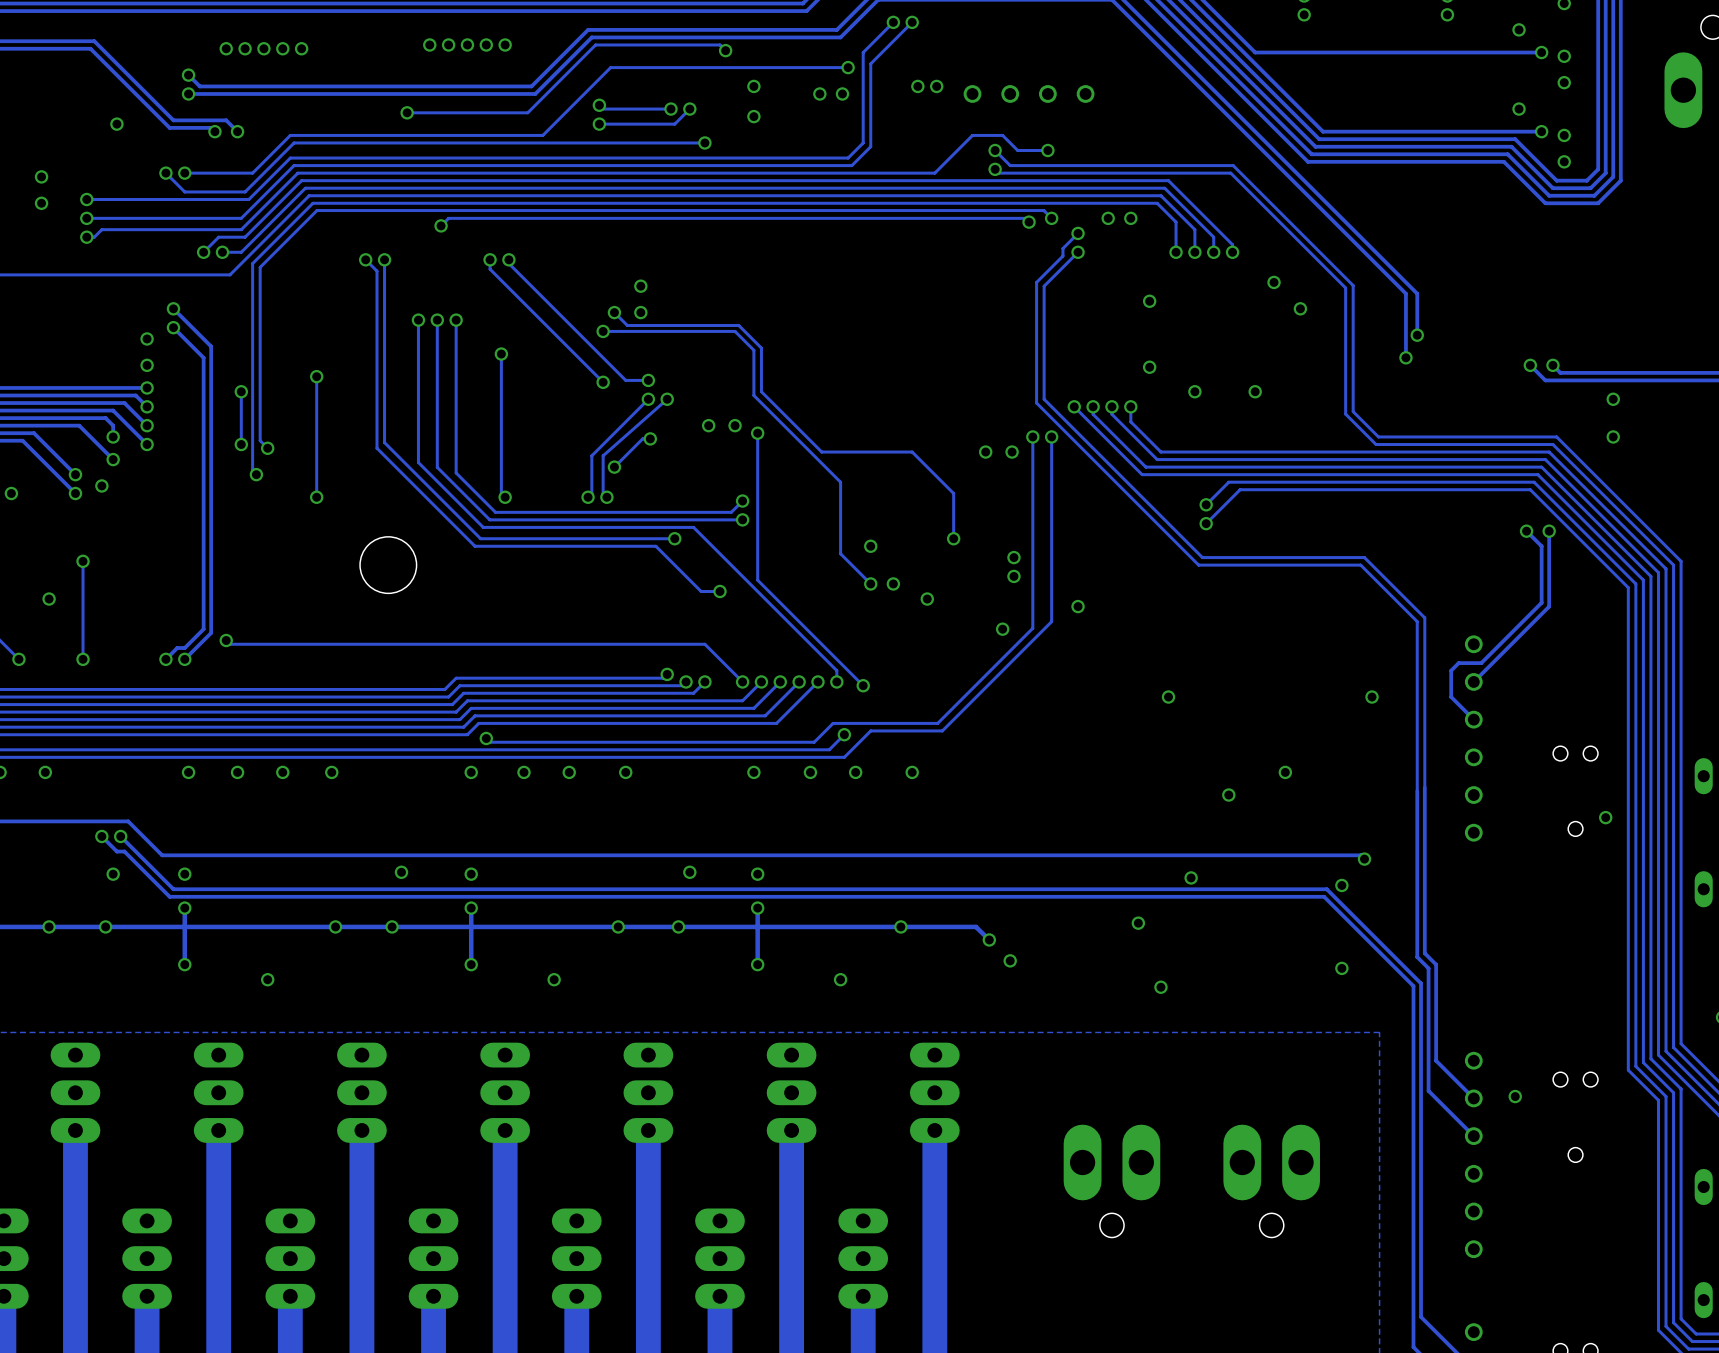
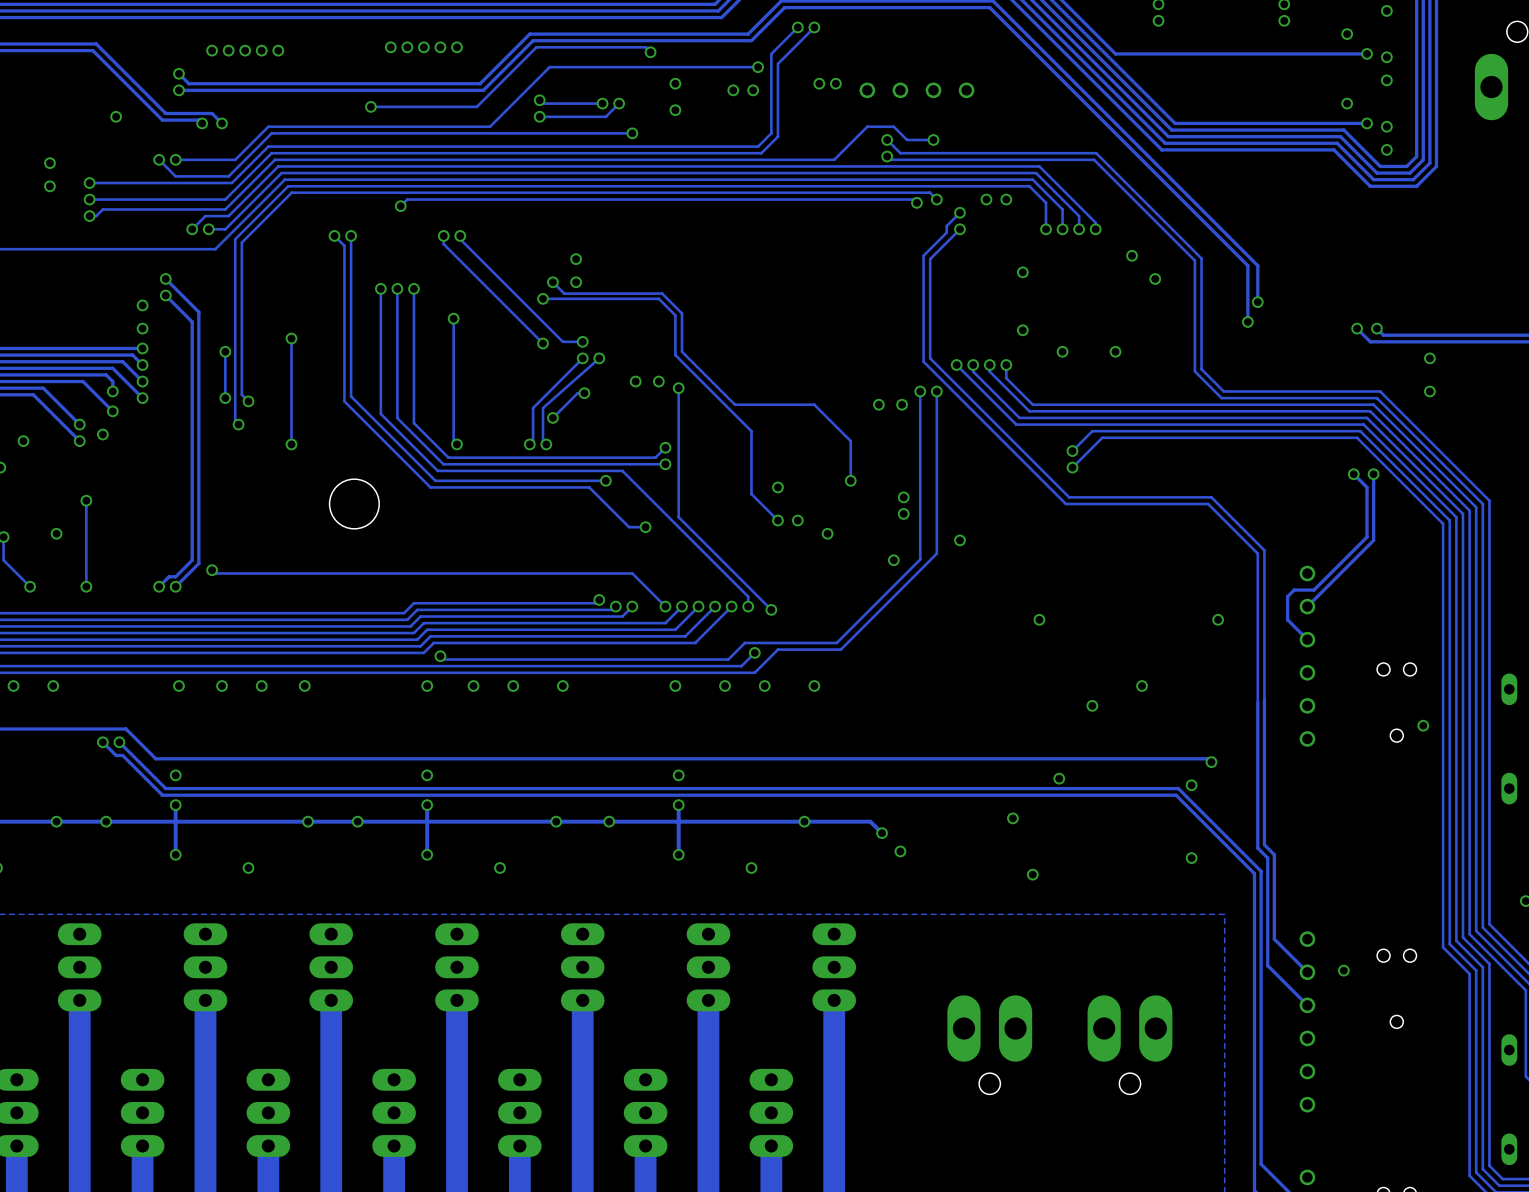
via: (401, 872) -> none
via: (689, 872) -> none
via: (113, 874) -> none

